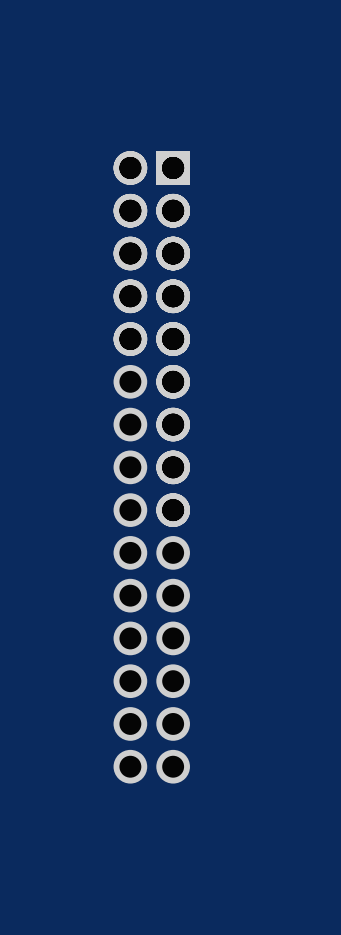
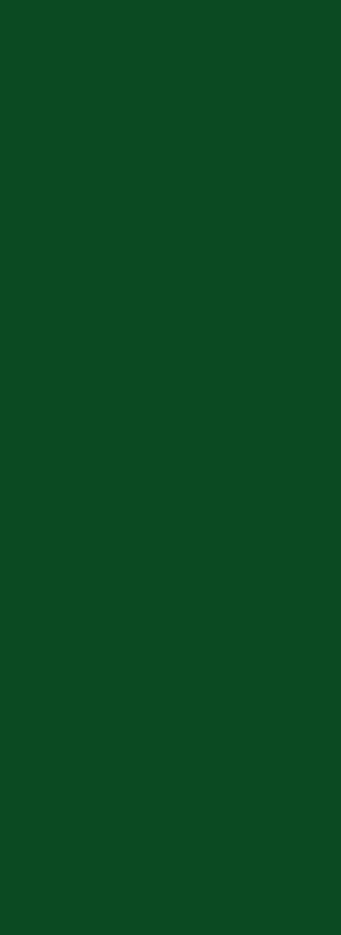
part: (151, 253) -> none
part: (173, 339) -> none
part: (151, 467) -> none

